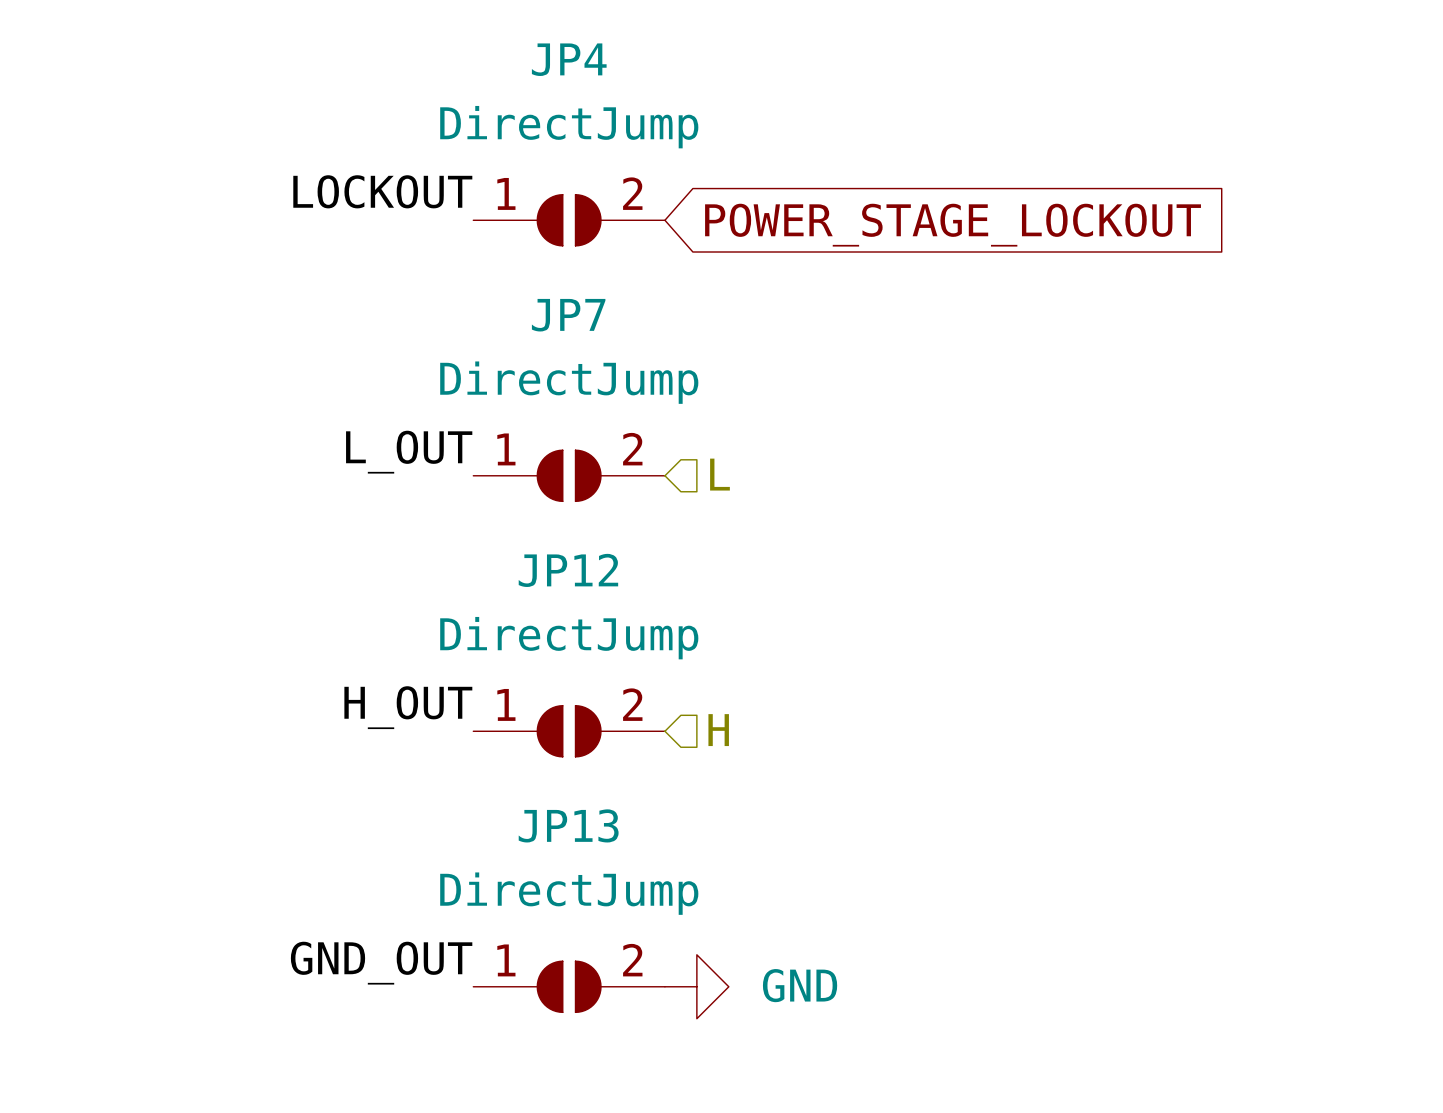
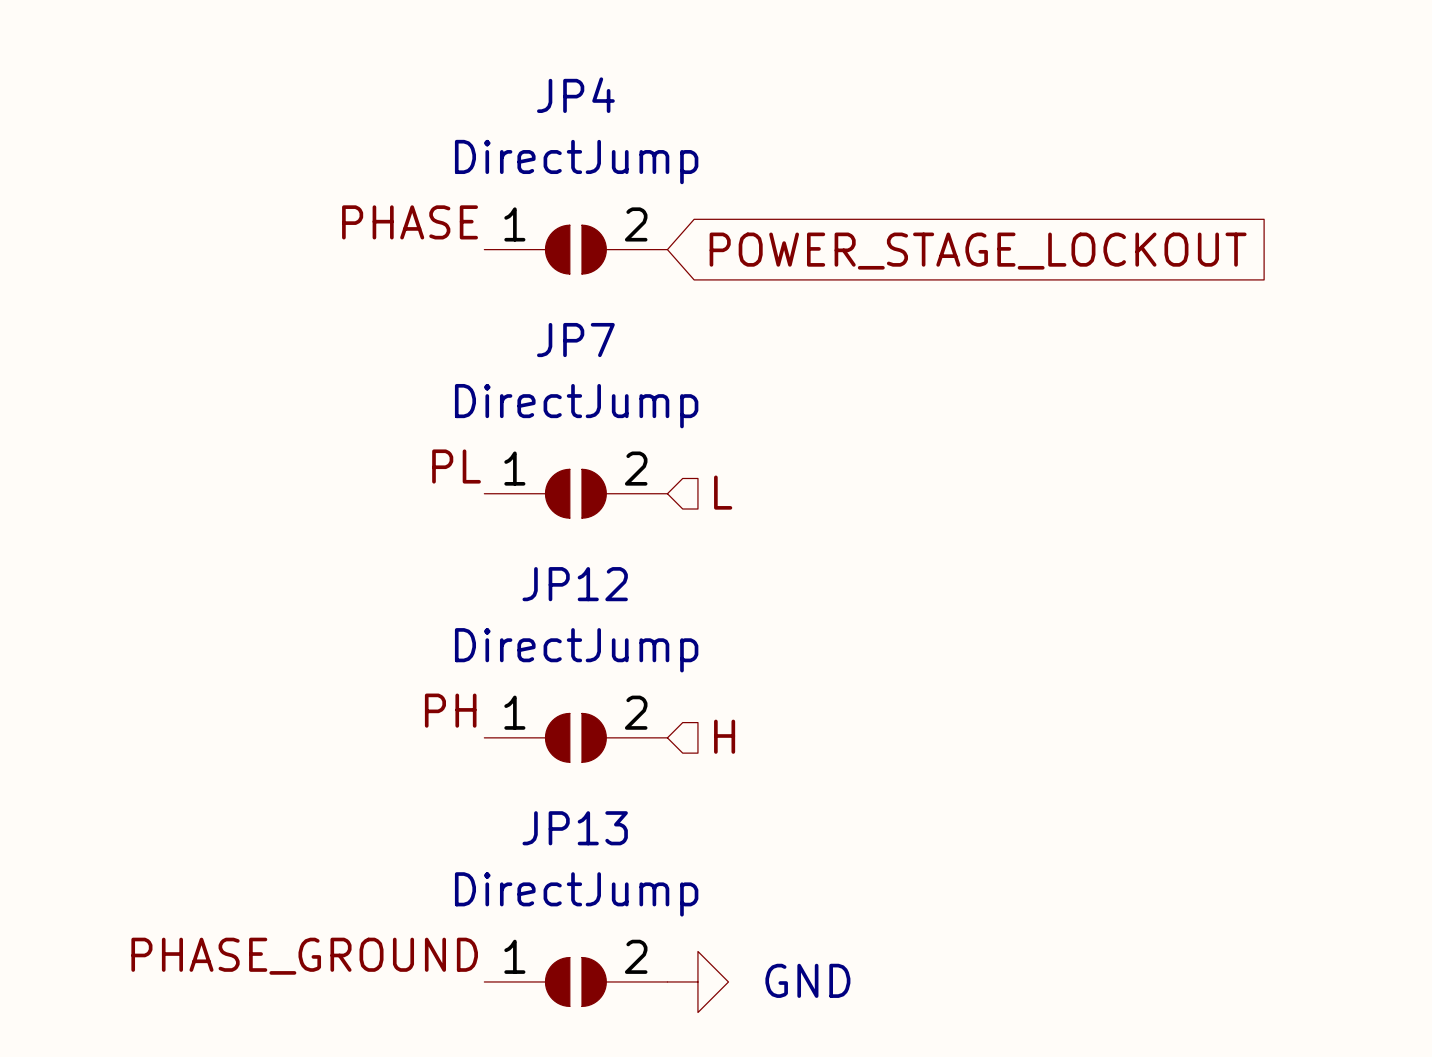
label: LOCKOUT (382, 191) -> PHASE (410, 222)
label: L_OUT (409, 452) -> PL (456, 466)
label: H_OUT (408, 707) -> PH (450, 710)
label: GND_OUT (381, 963) -> PHASE_GROUND (304, 956)

